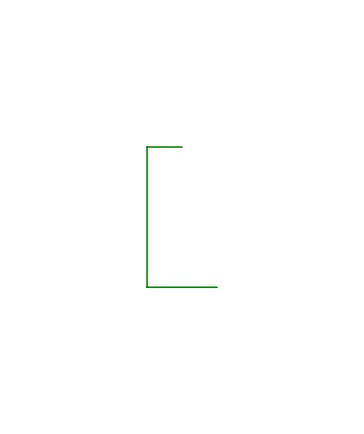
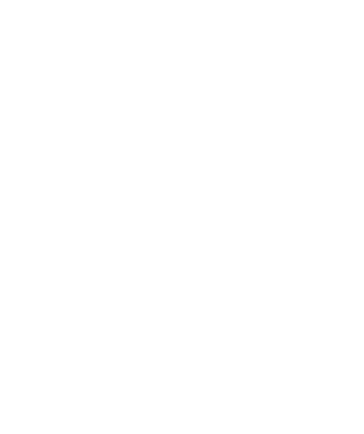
wire: (182, 147) (147, 147) (147, 287) (217, 287) -> none

